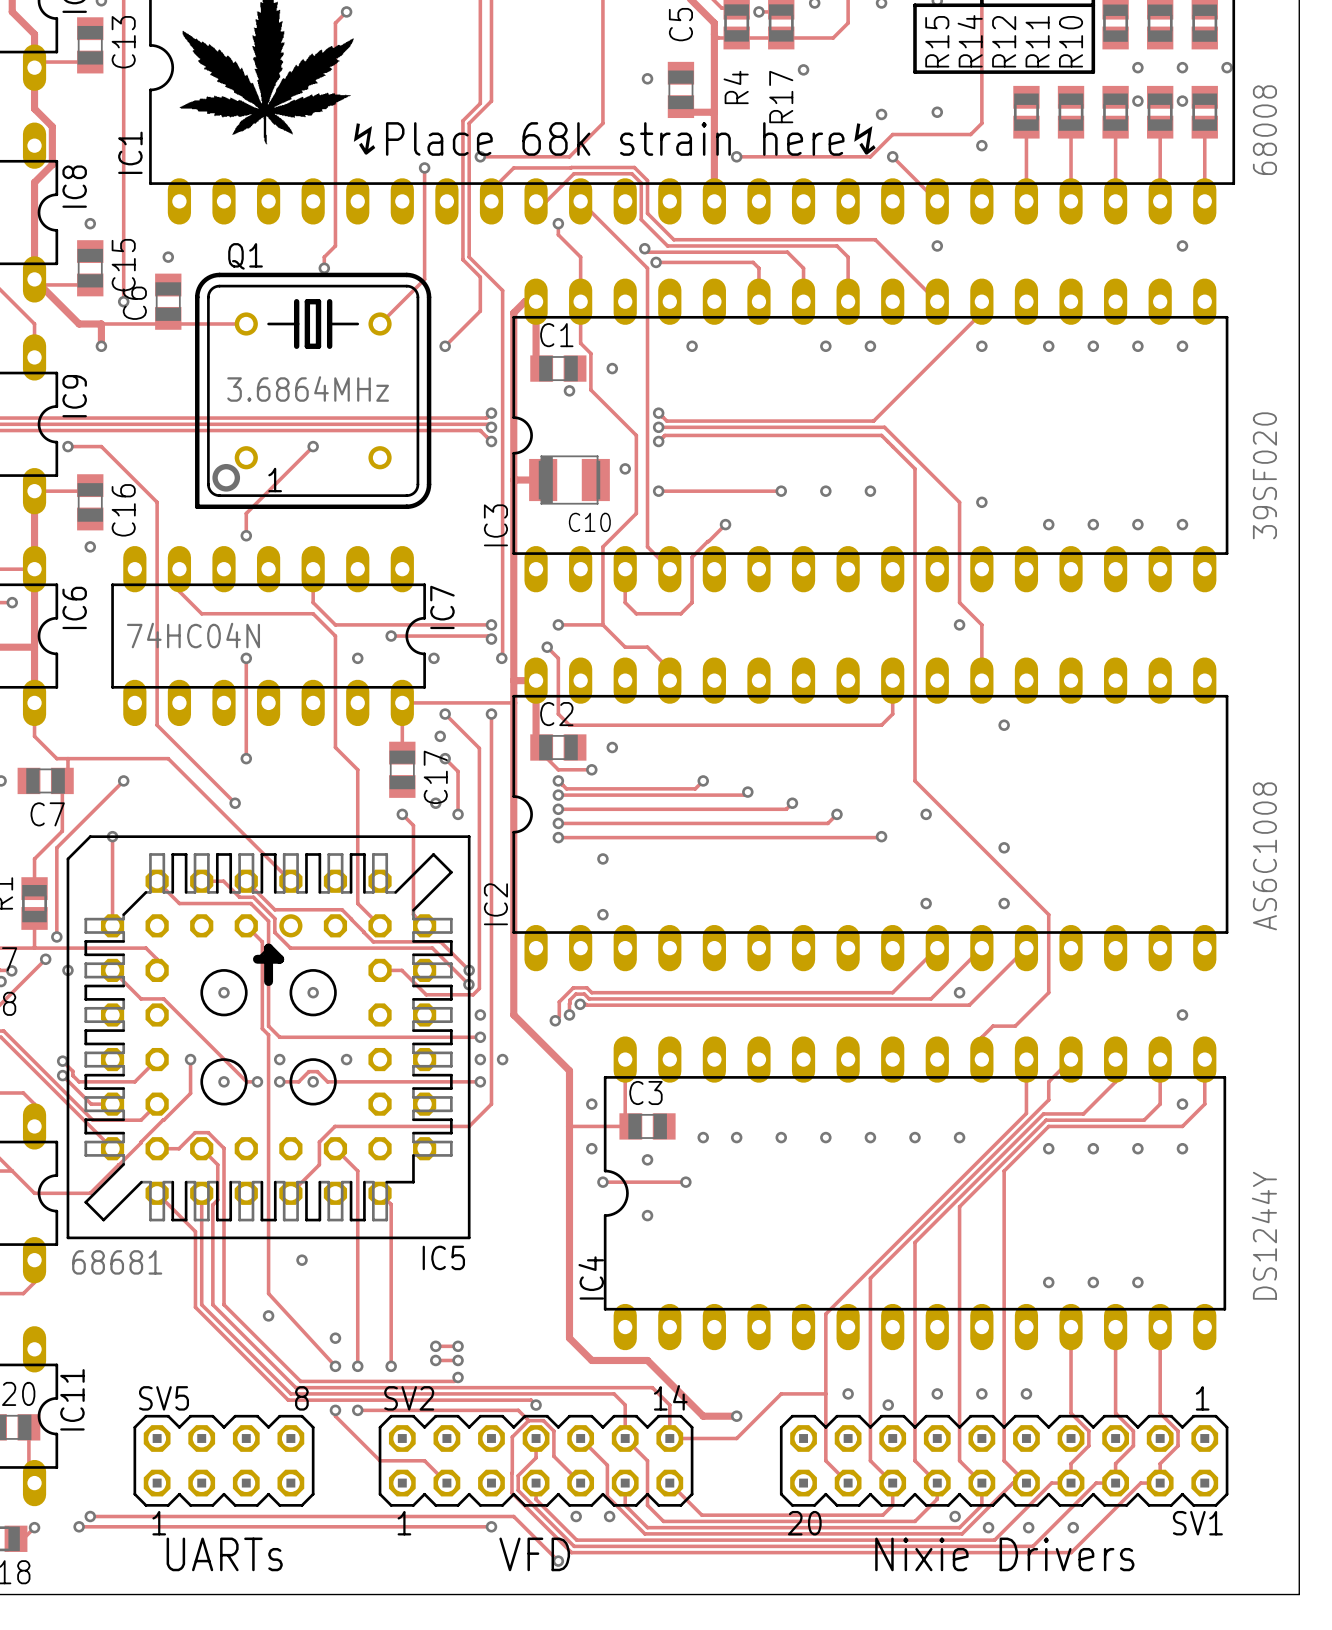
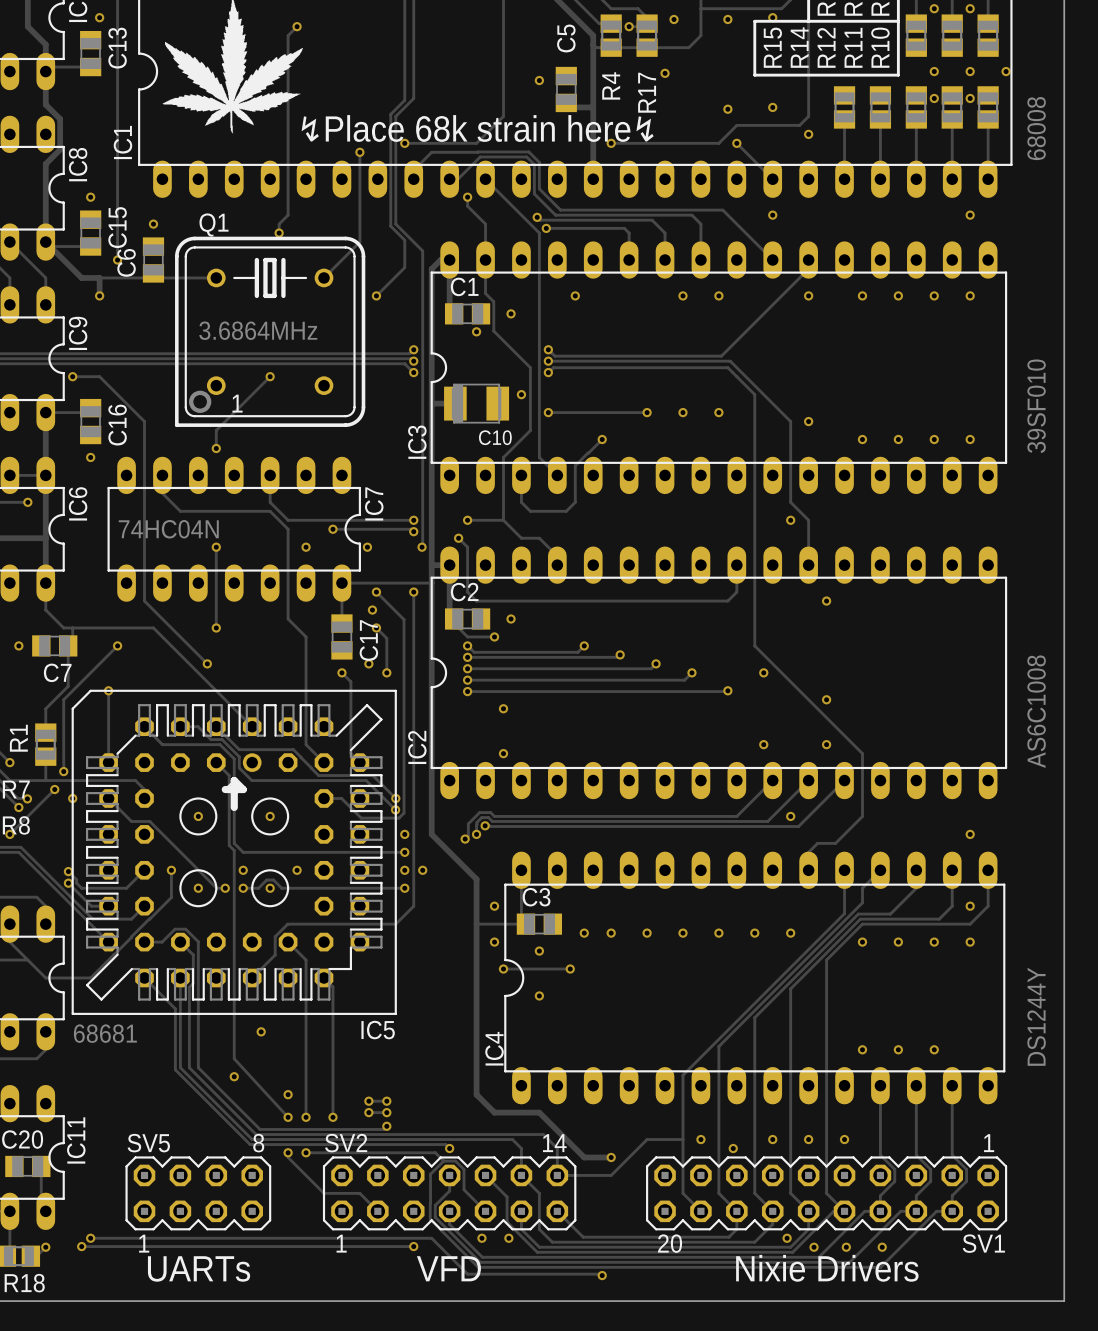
IC3 value: 39SF020 (1264, 475) -> 39SF010 (1036, 406)
track: none -> (467, 1274) (602, 1275)
via: (558, 1561) -> none
via: none -> (602, 1275)

